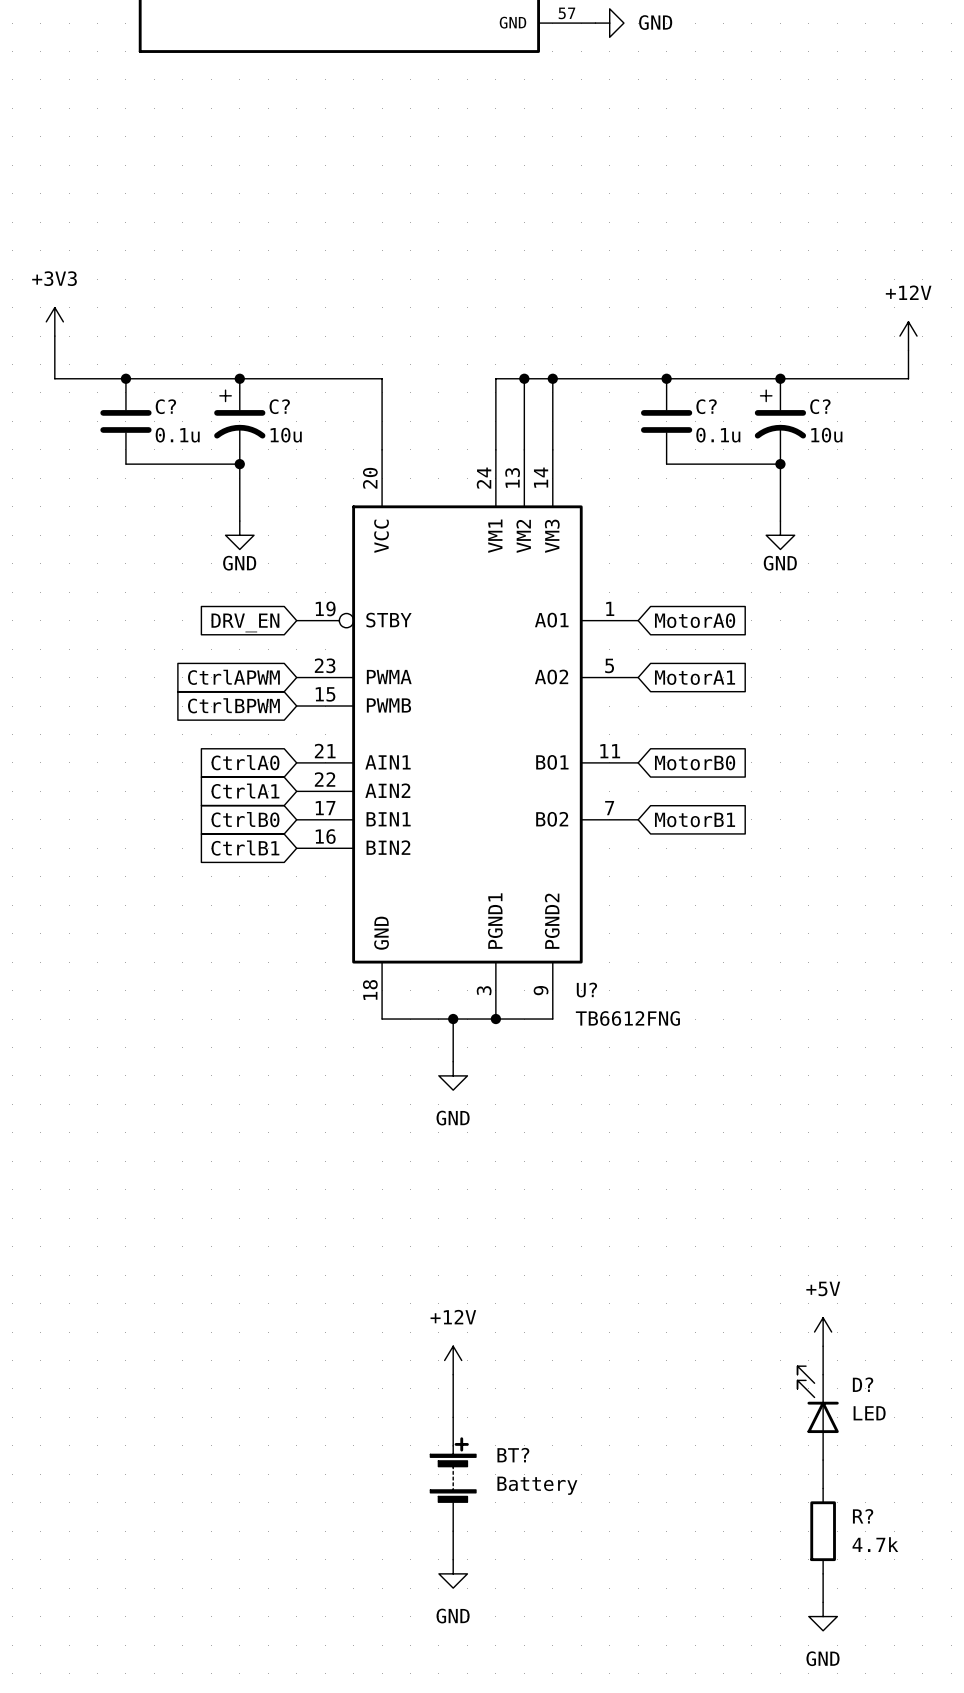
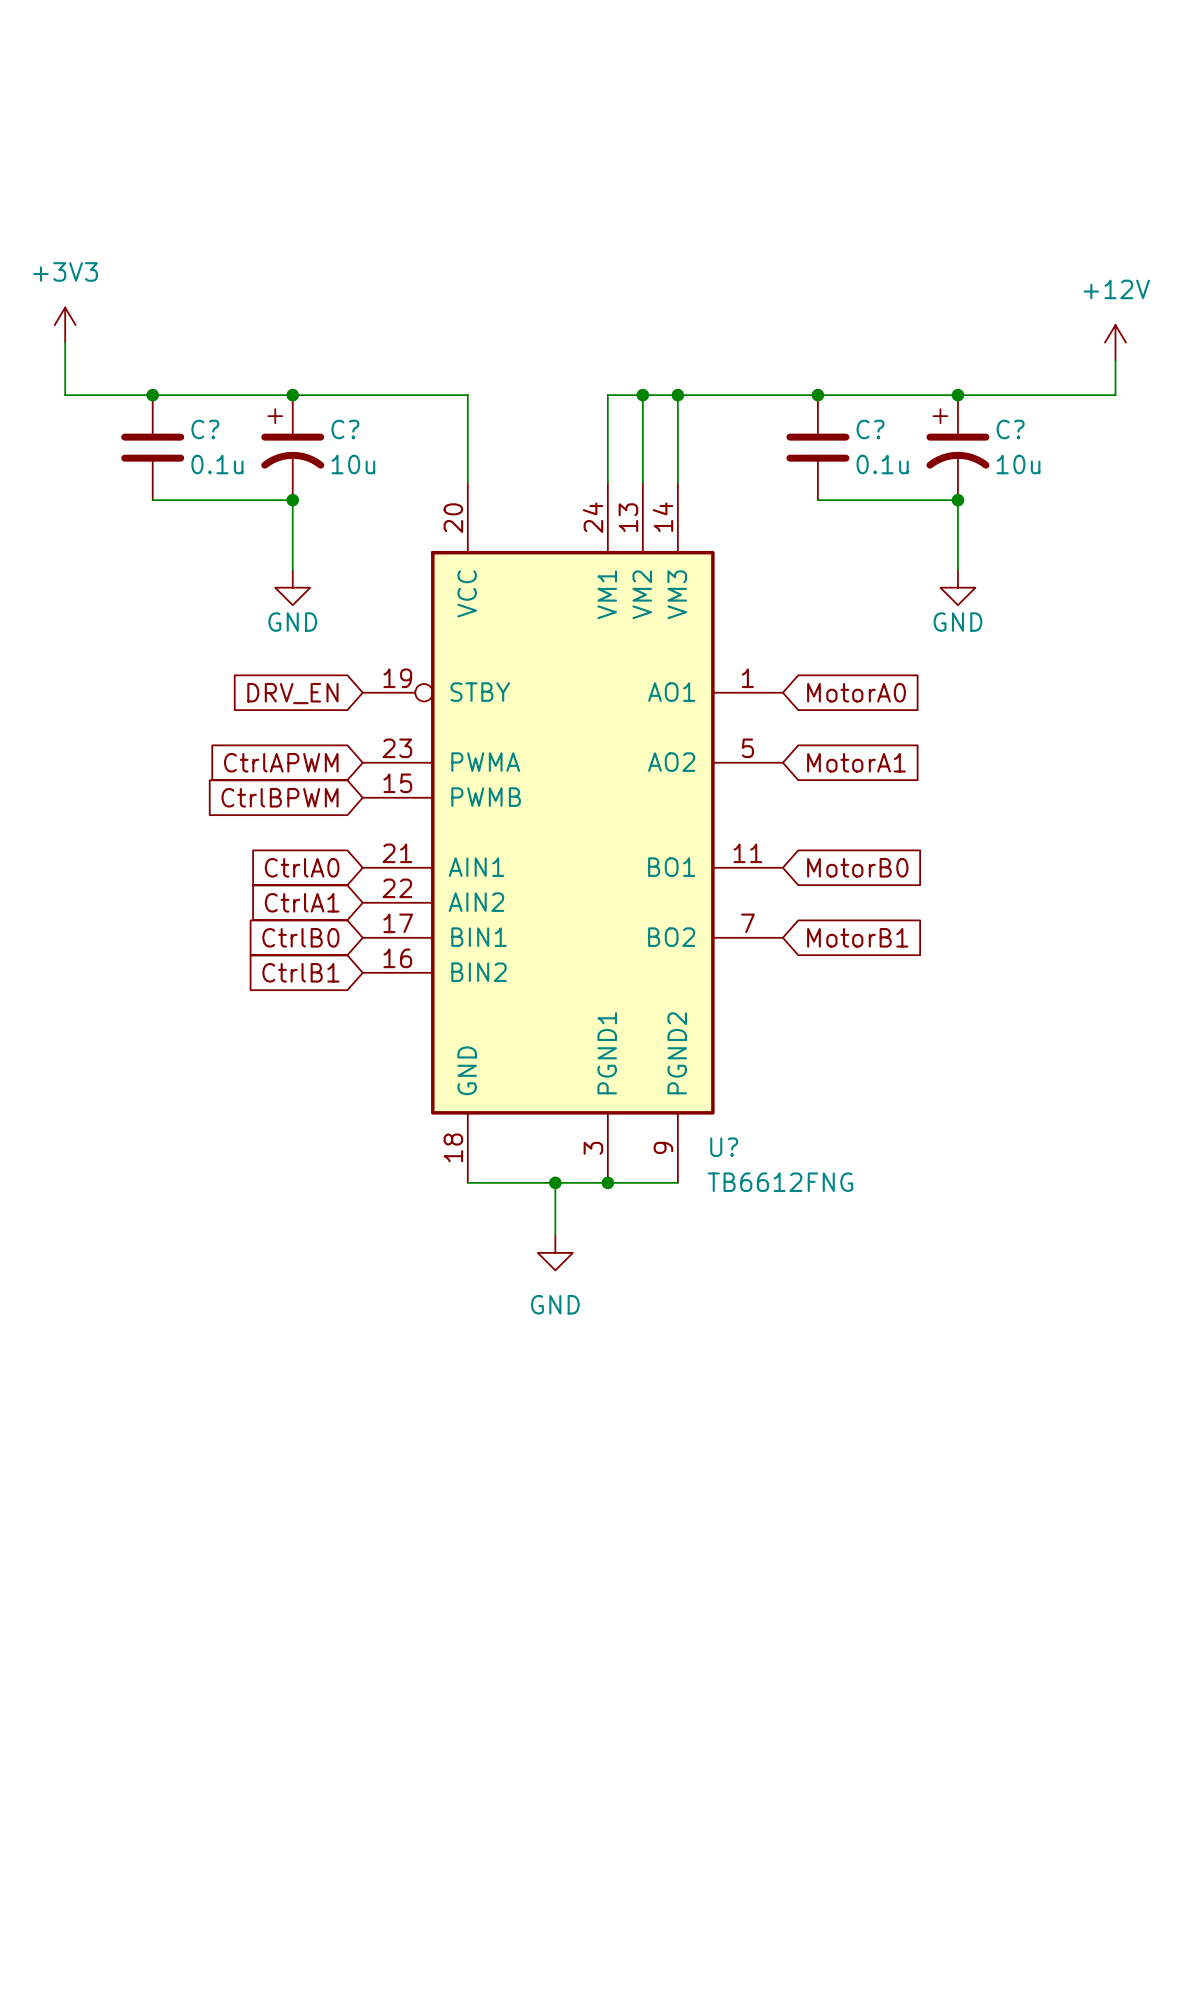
power symbol: +5V (823, 1332) -> none
wire: (823, 1346) (823, 1374) -> none
power symbol: +12V (453, 1360) -> none
wire: (453, 1374) (453, 1417) -> none
D?: LED (818, 1413) -> none
wire: (823, 1460) (823, 1488) -> none
BT?: Battery (453, 1474) -> none
wire: (453, 1531) (453, 1559) -> none
R?: 4.7k (823, 1531) -> none
power symbol: GND (453, 1573) -> none
wire: (823, 1573) (823, 1602) -> none
power symbol: GND (823, 1616) -> none

